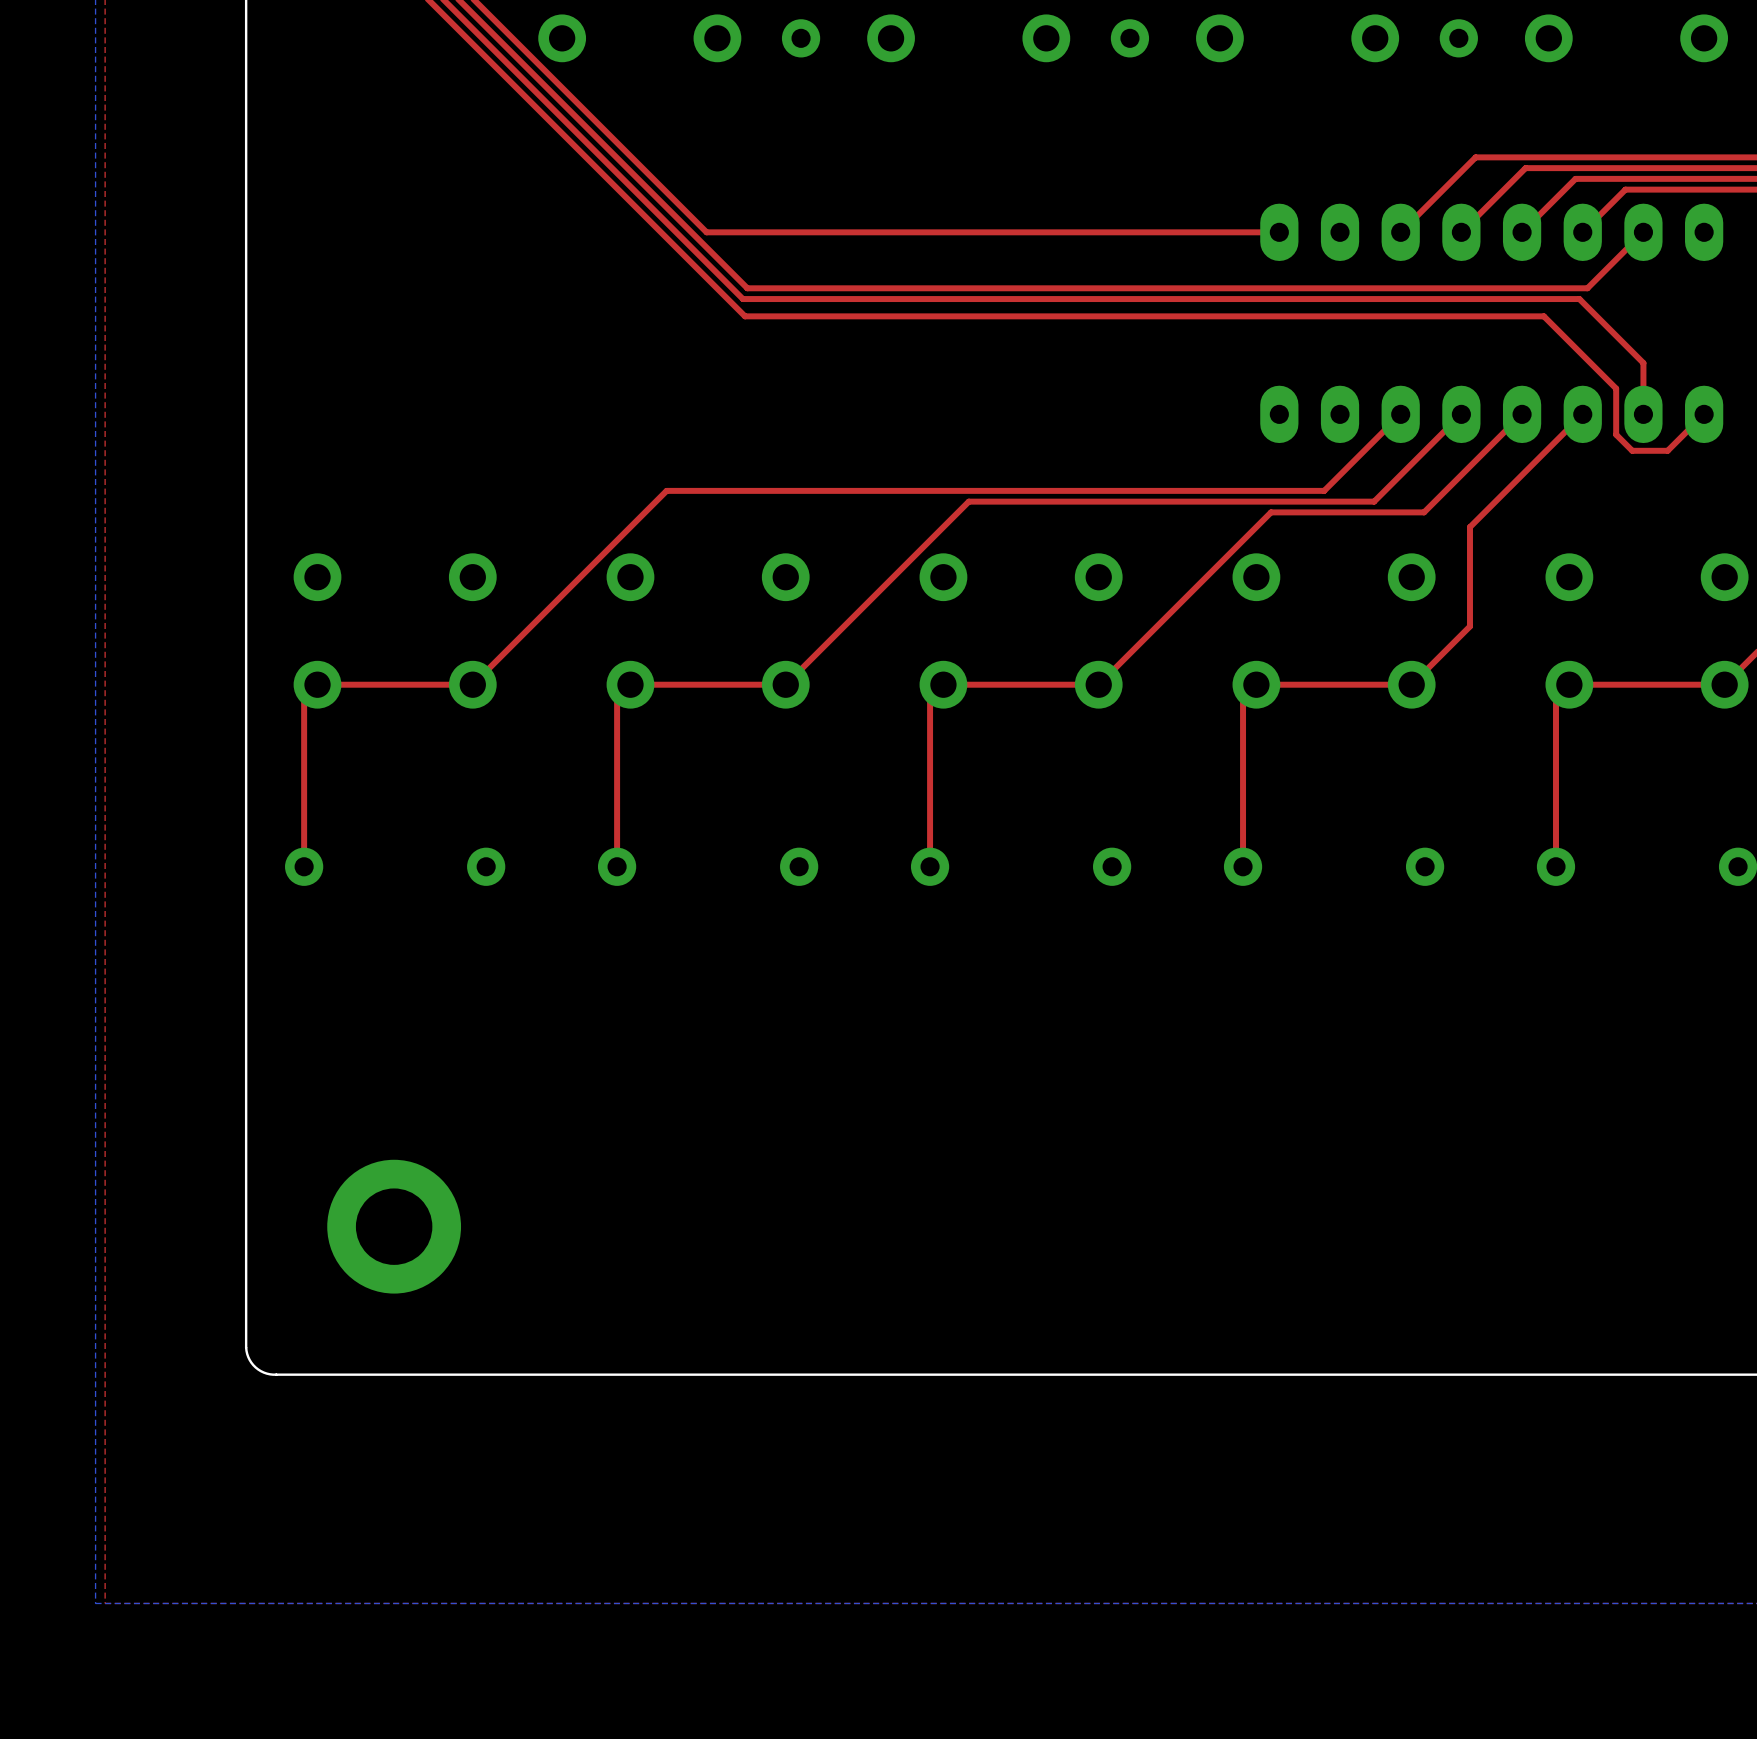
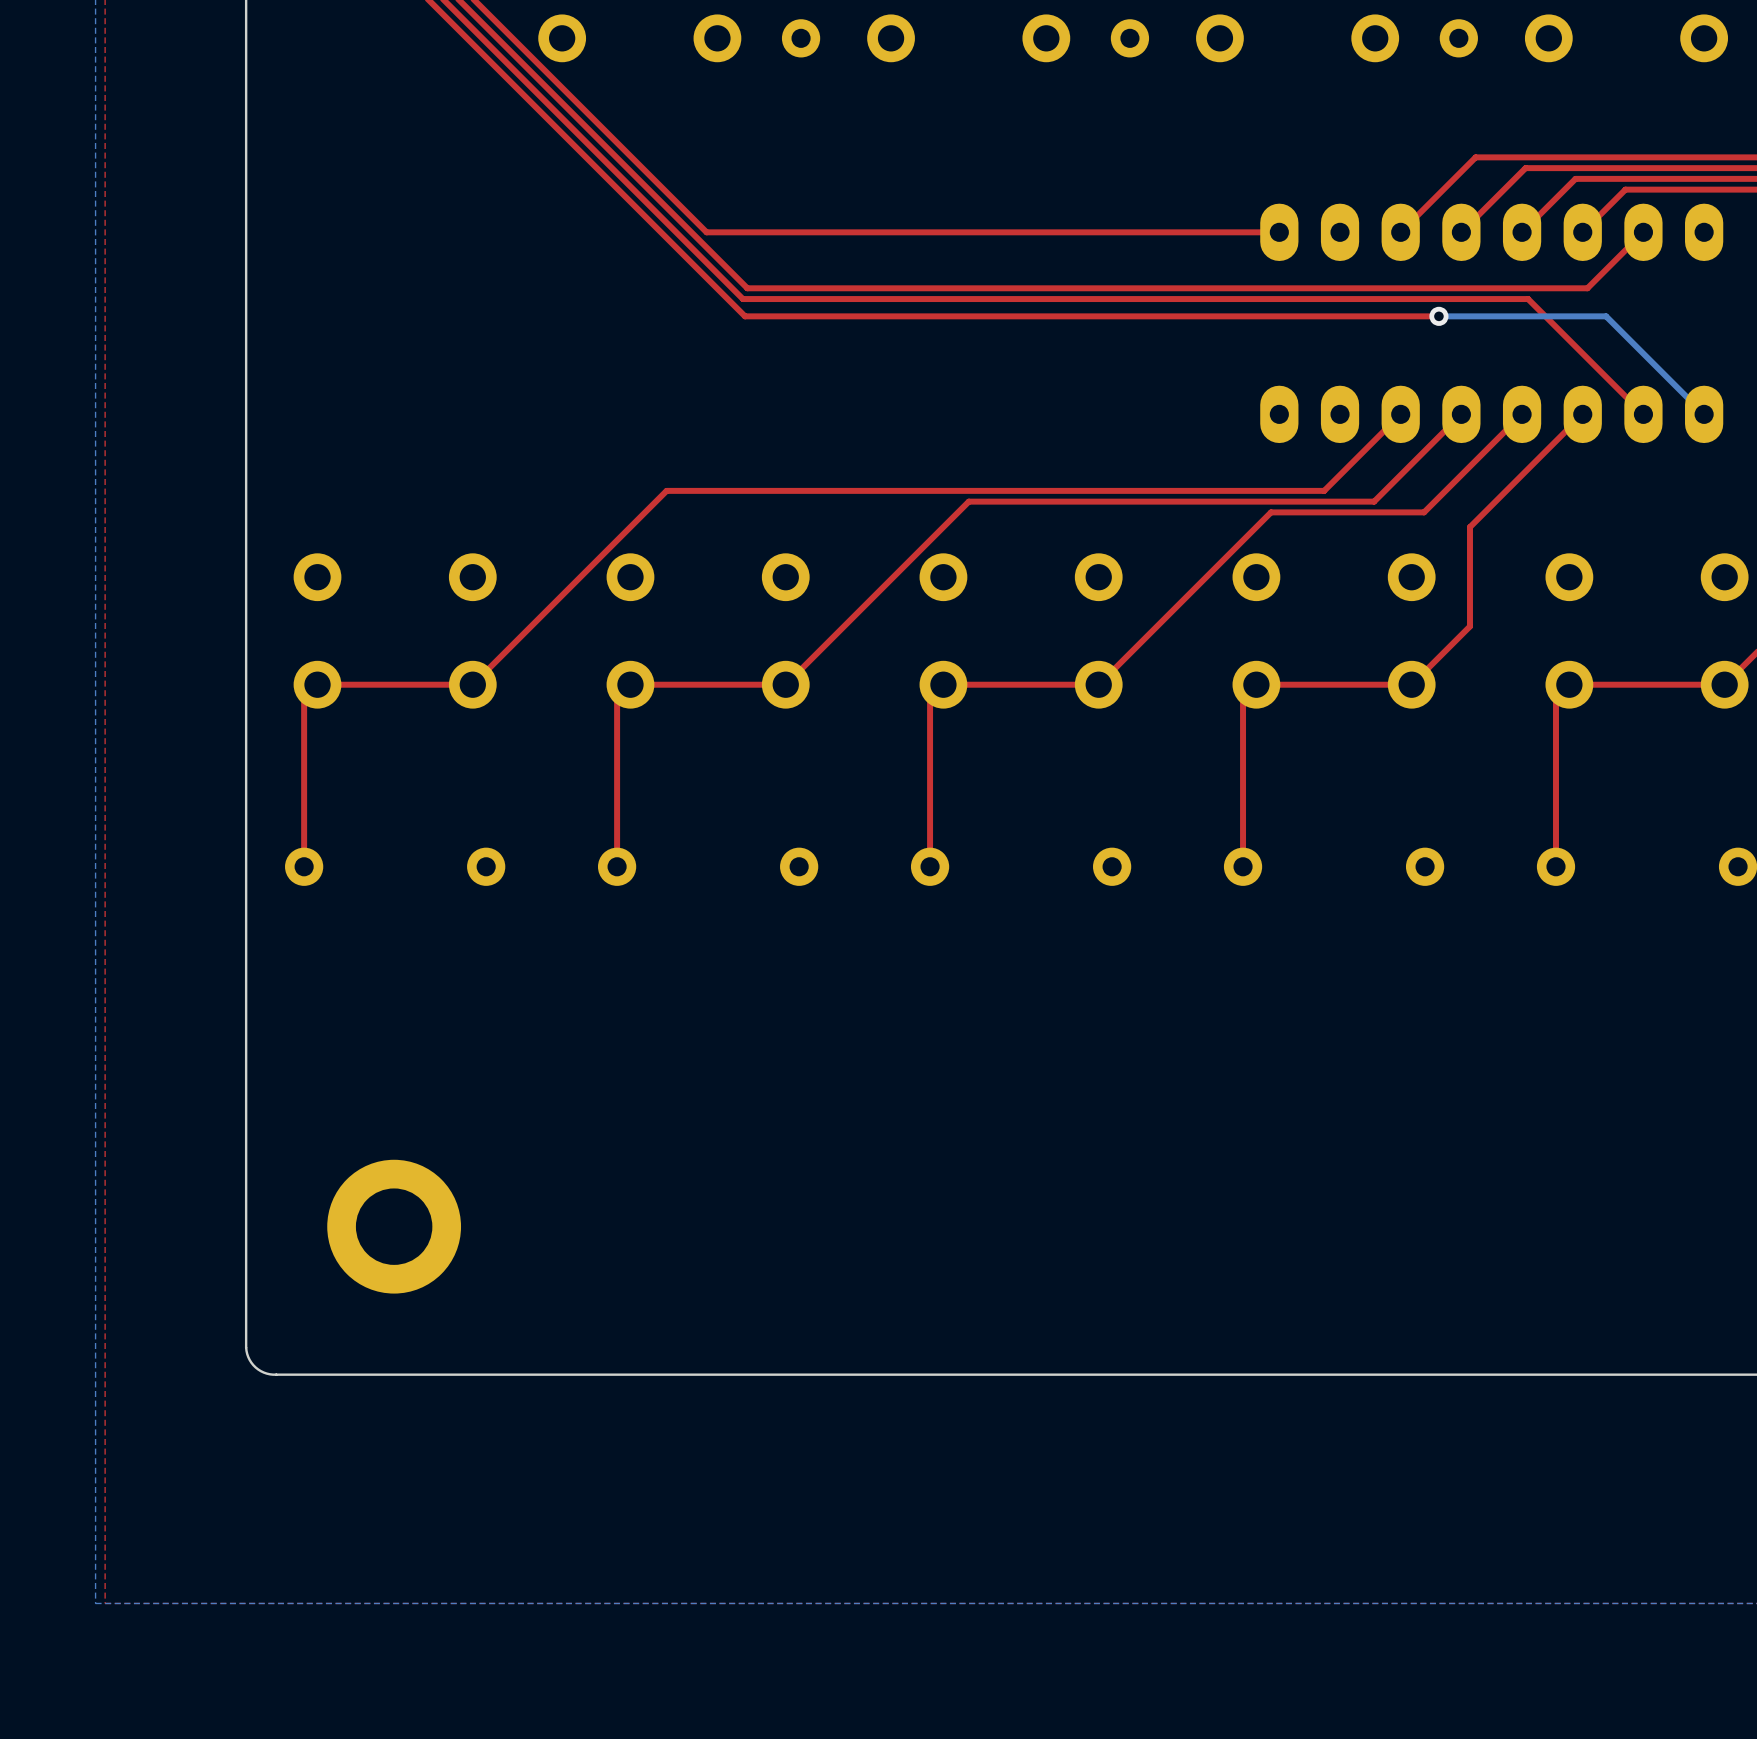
top track: (1528, 299) (1579, 299) (1643, 363) (1643, 414) -> (1528, 299) (1643, 414)
top track: (1438, 316) (1543, 316) (1616, 388) (1616, 434) (1632, 450) (1667, 450) (1704, 414) -> none
bottom track: none -> (1438, 316) (1606, 316) (1704, 414)
via: none -> (1438, 316)

